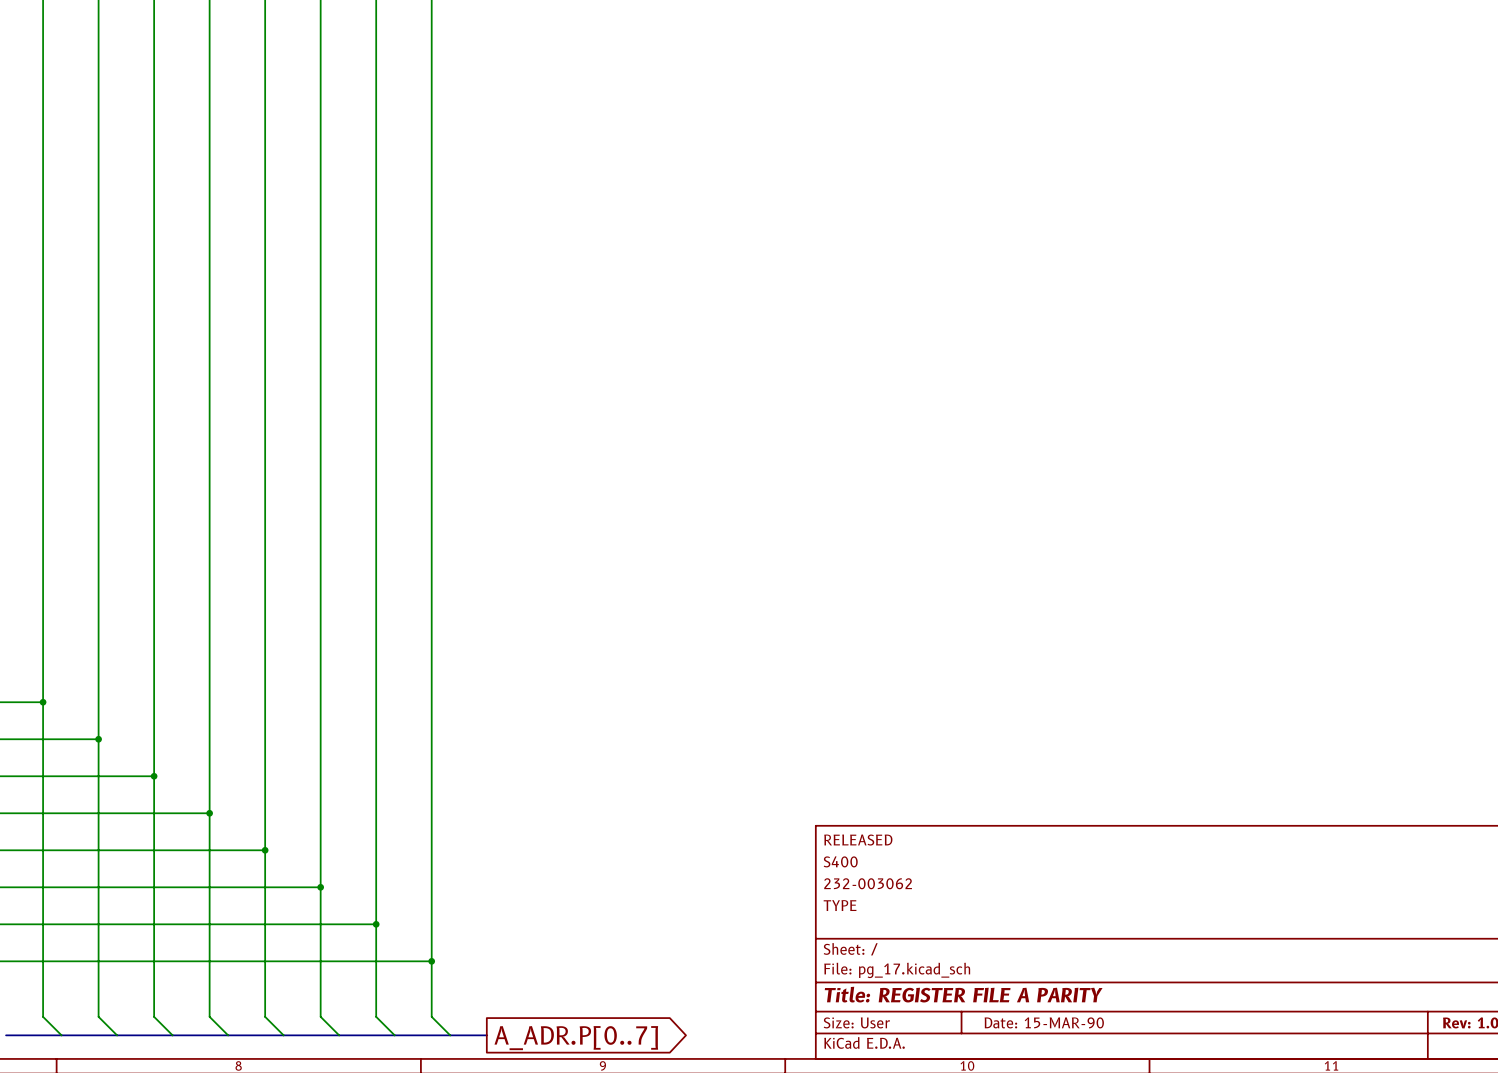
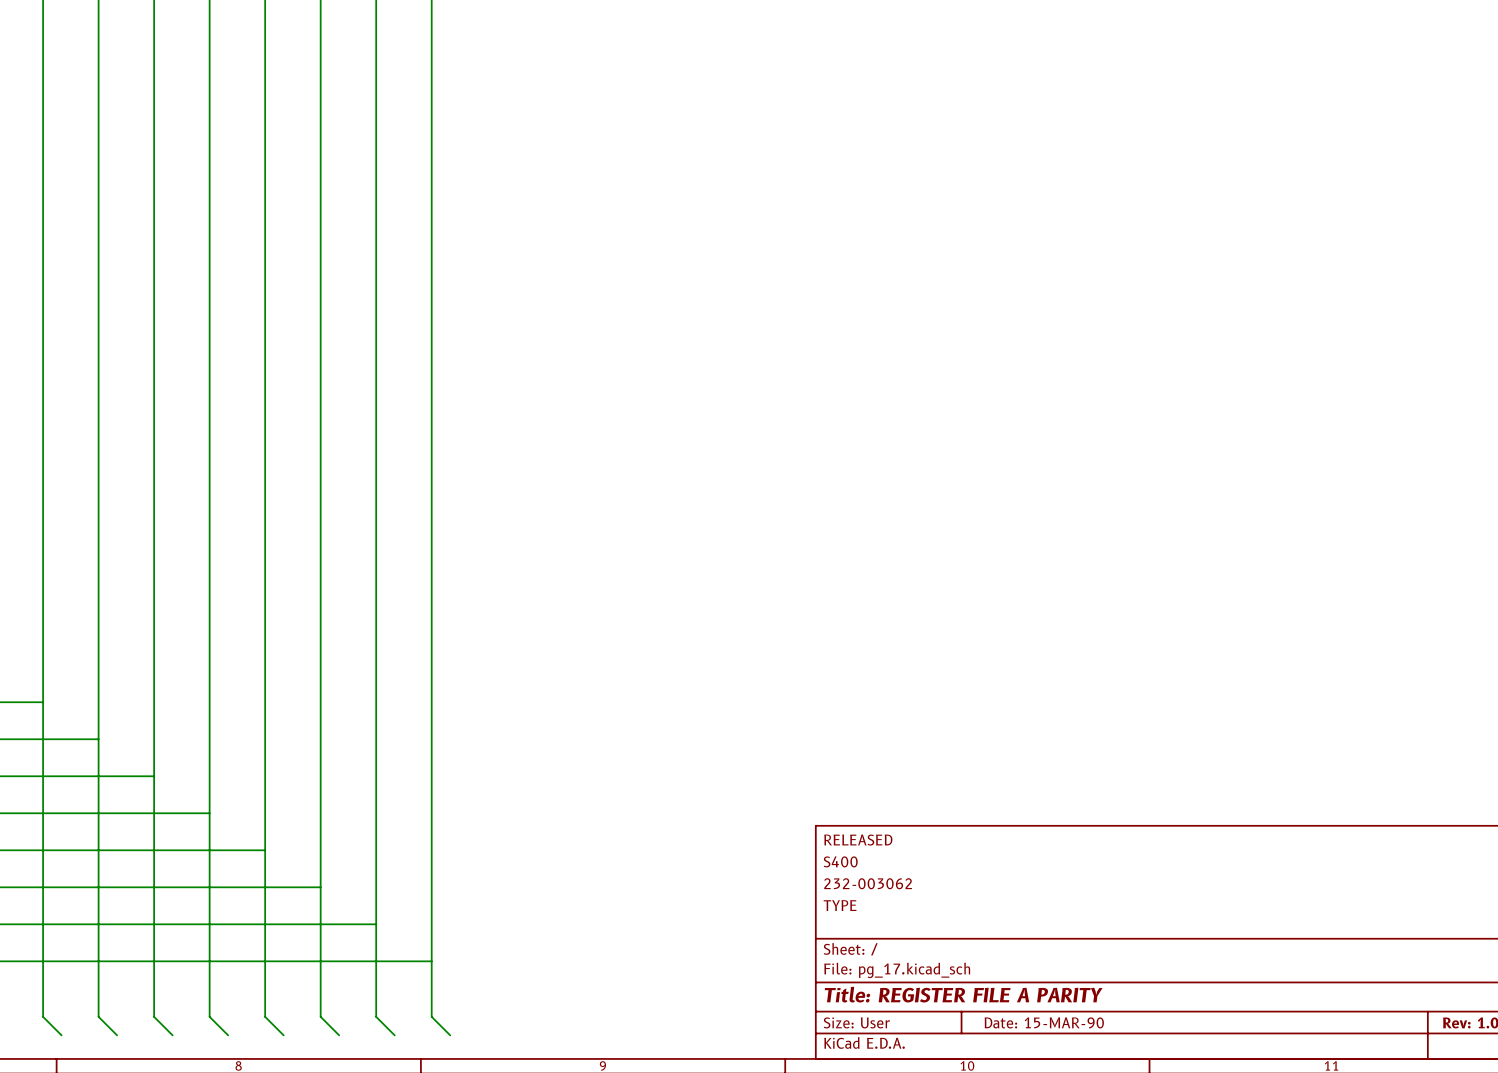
junction: (43, 702) -> none
junction: (98, 739) -> none
junction: (154, 776) -> none
junction: (209, 813) -> none
junction: (265, 850) -> none
junction: (320, 887) -> none
junction: (376, 924) -> none
junction: (431, 961) -> none
bus: (6, 1035) (487, 1035) -> none
global label: A_ADR.P[0..7] (576, 1038) -> none

